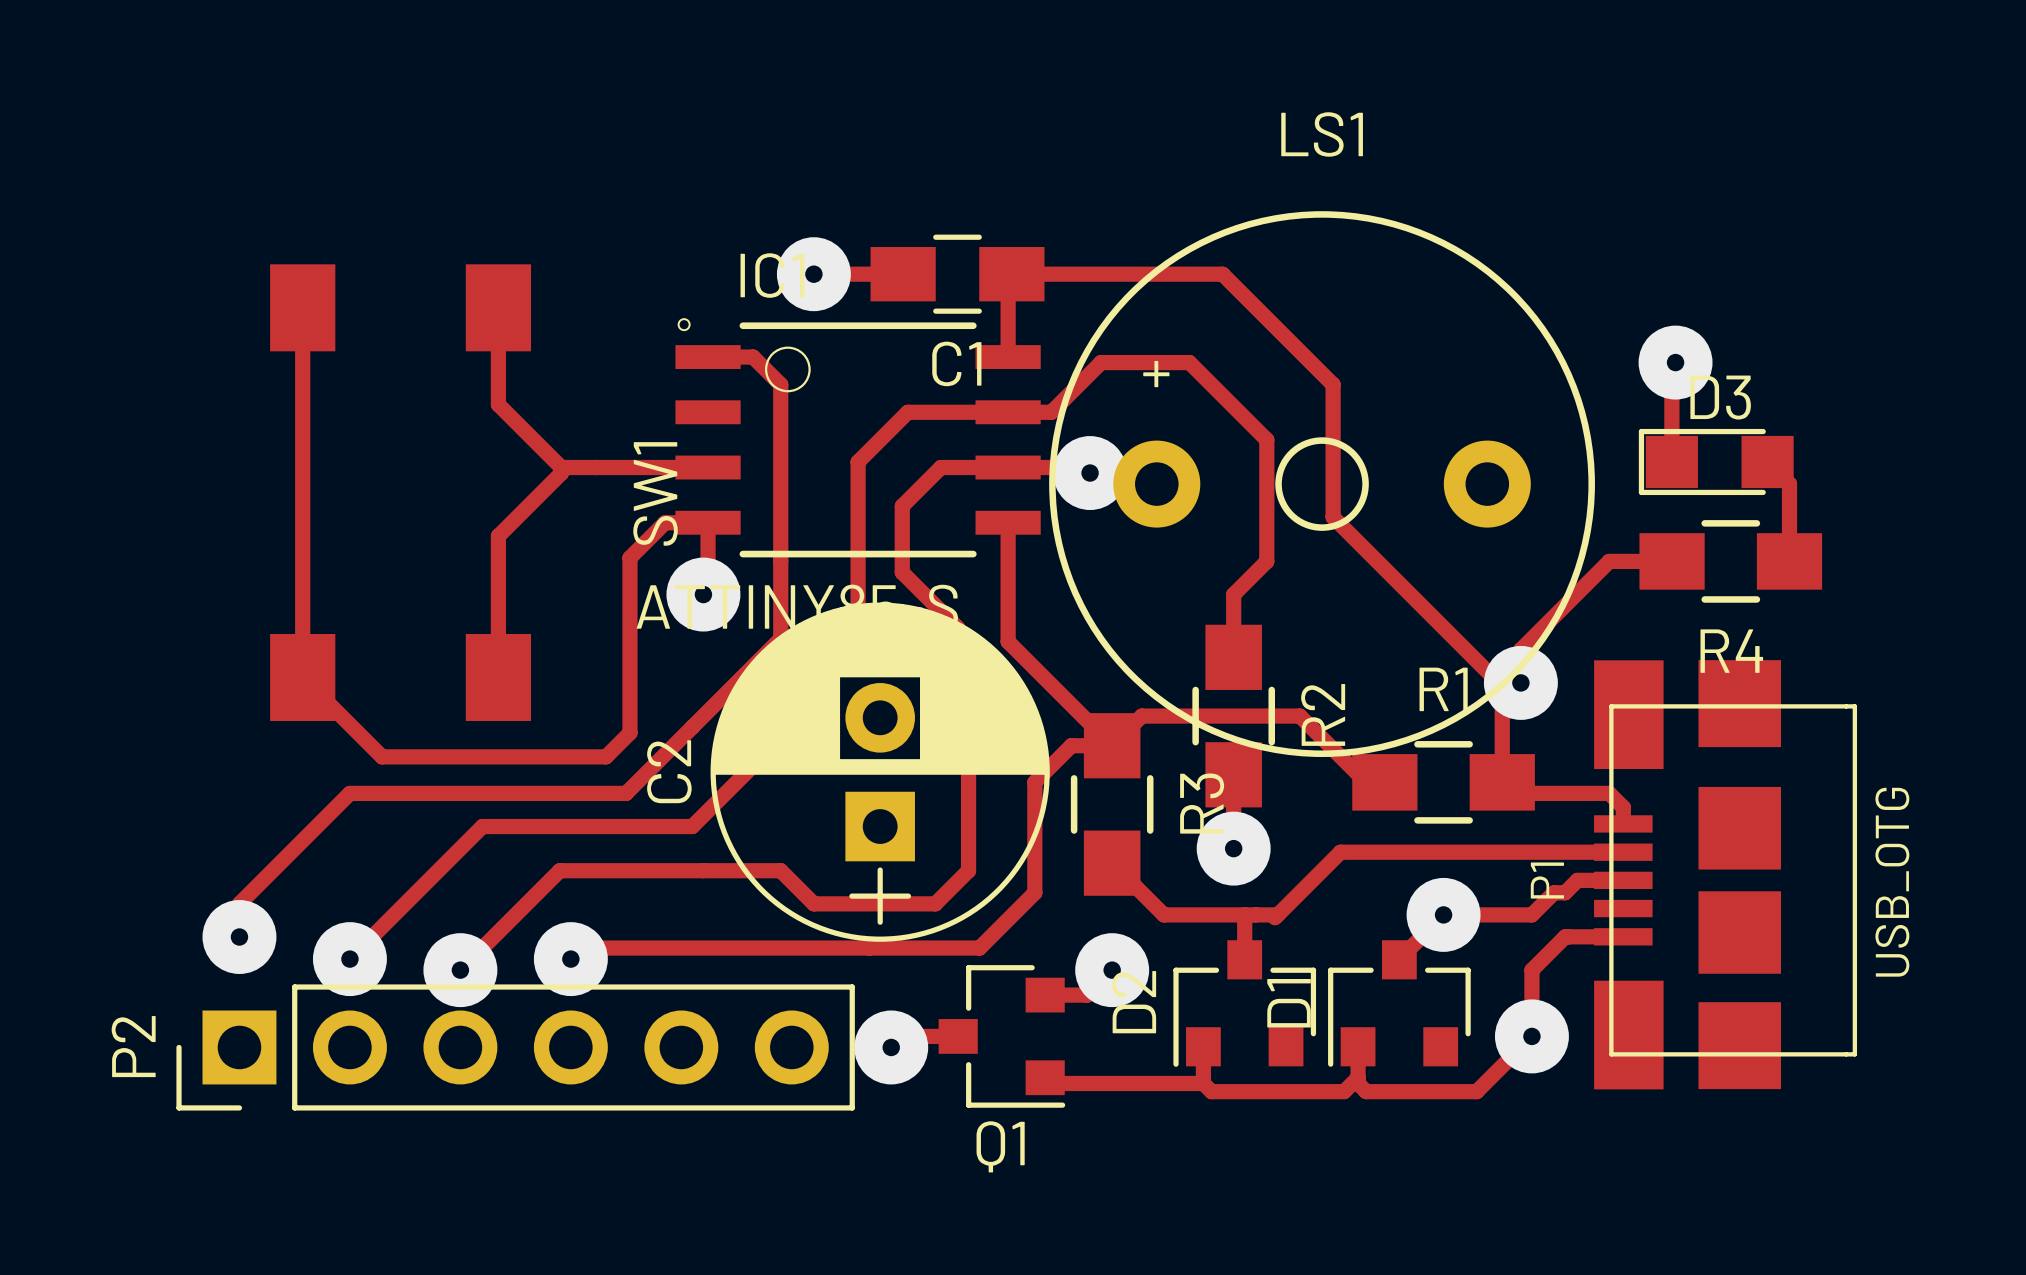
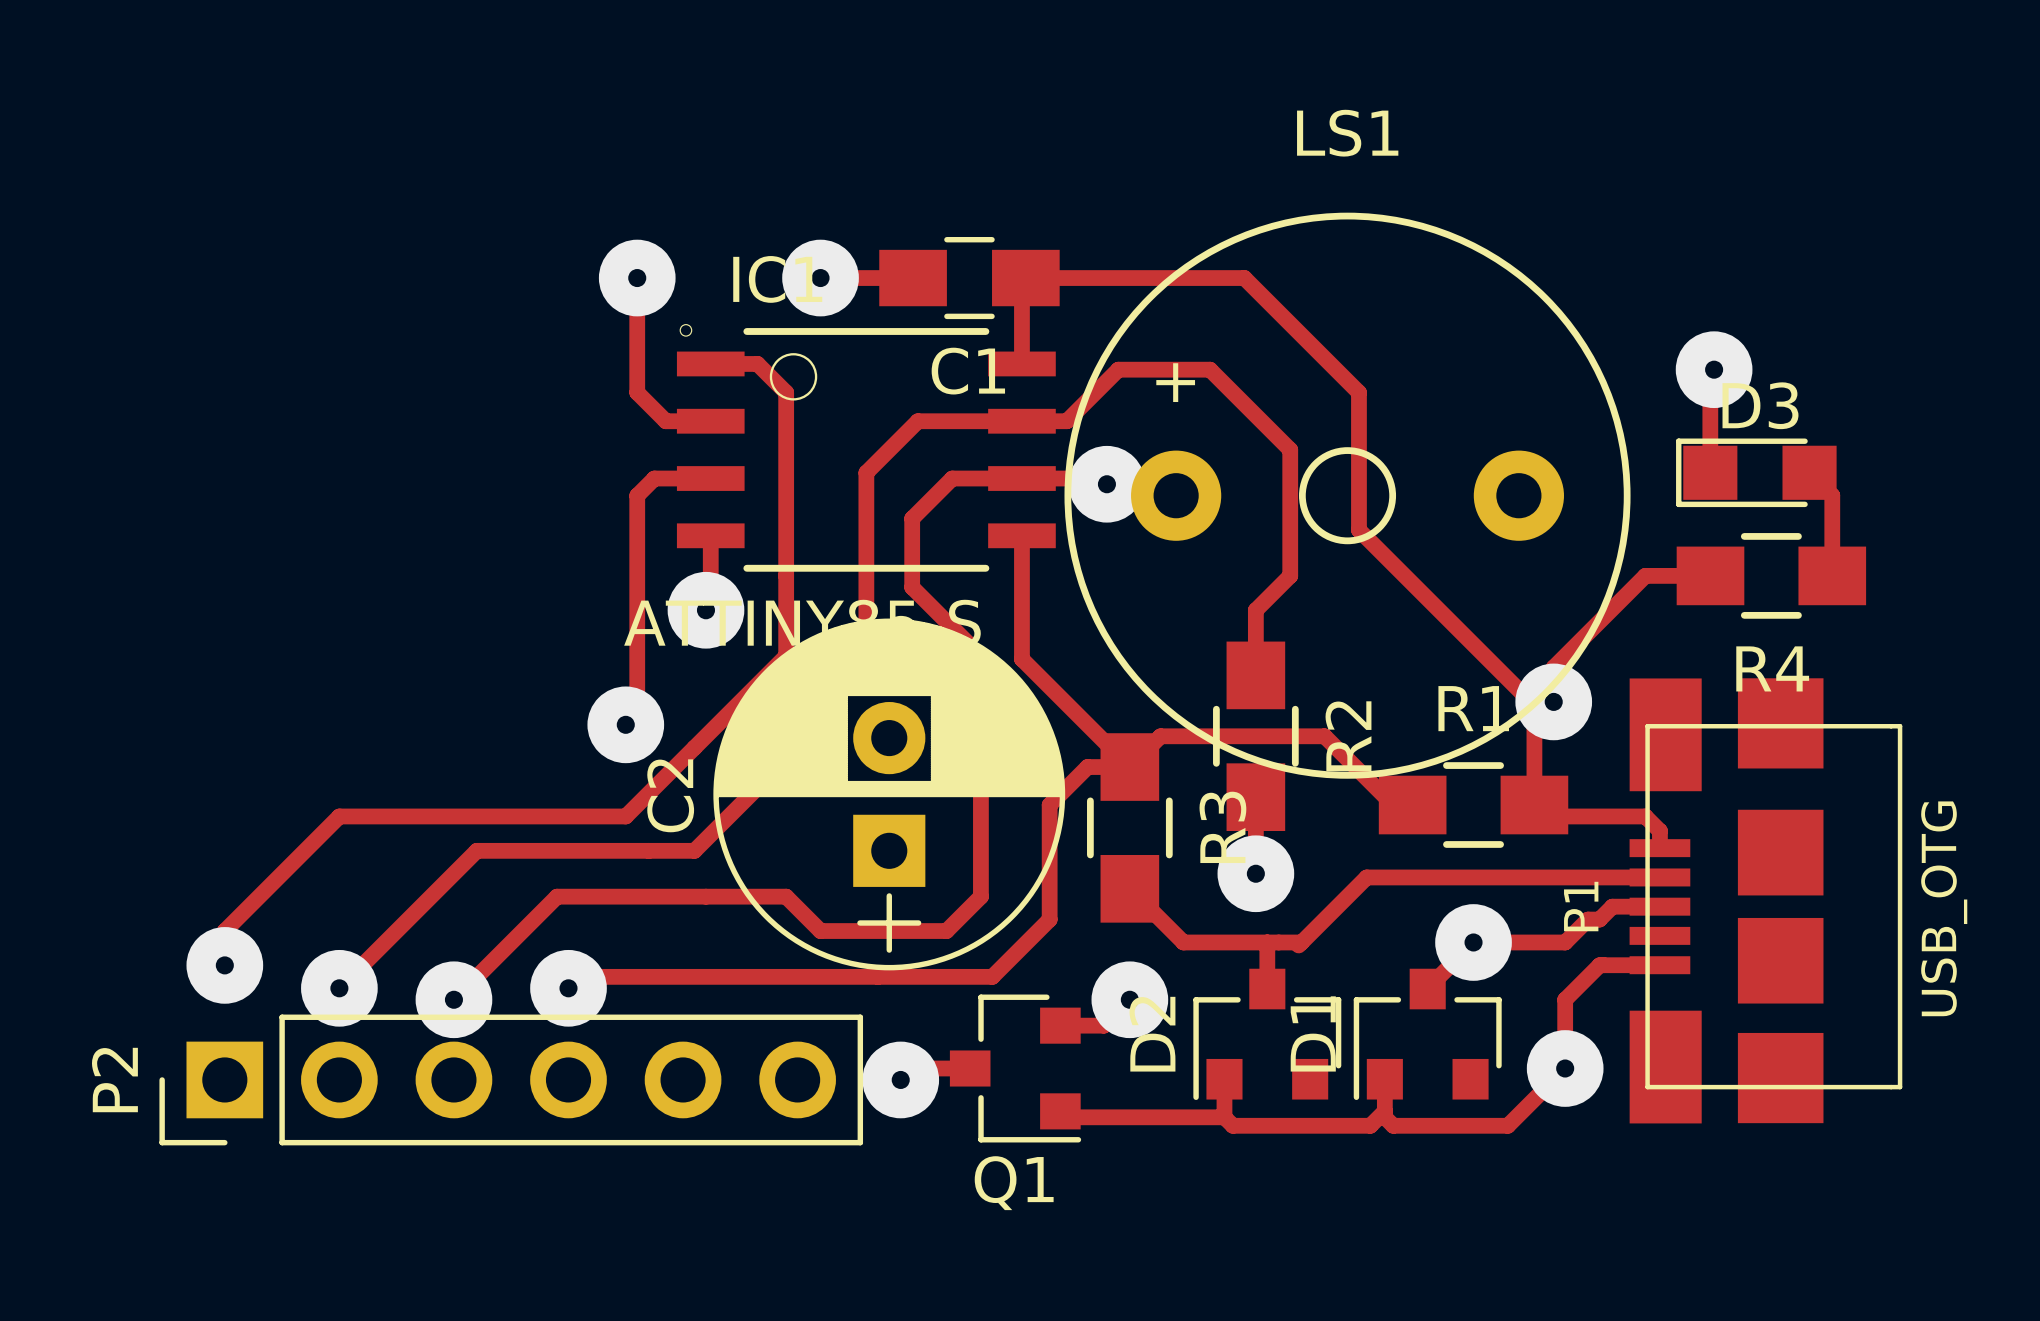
track: none -> (637, 278) (637, 392) (665, 421) (710, 421)
via: none -> (637, 278)
track: (302, 307) (302, 677) (382, 756) (606, 756) (629, 732) (629, 557) (665, 522) (708, 522) -> none
track: (498, 307) (498, 404) (561, 467) -> none
track: (561, 467) (653, 467) -> (625, 724) (637, 713) (637, 495) (654, 478)
track: (561, 467) (561, 473) (498, 536) (498, 677) -> none
SW1: (400, 492) -> none
via: none -> (625, 724)

